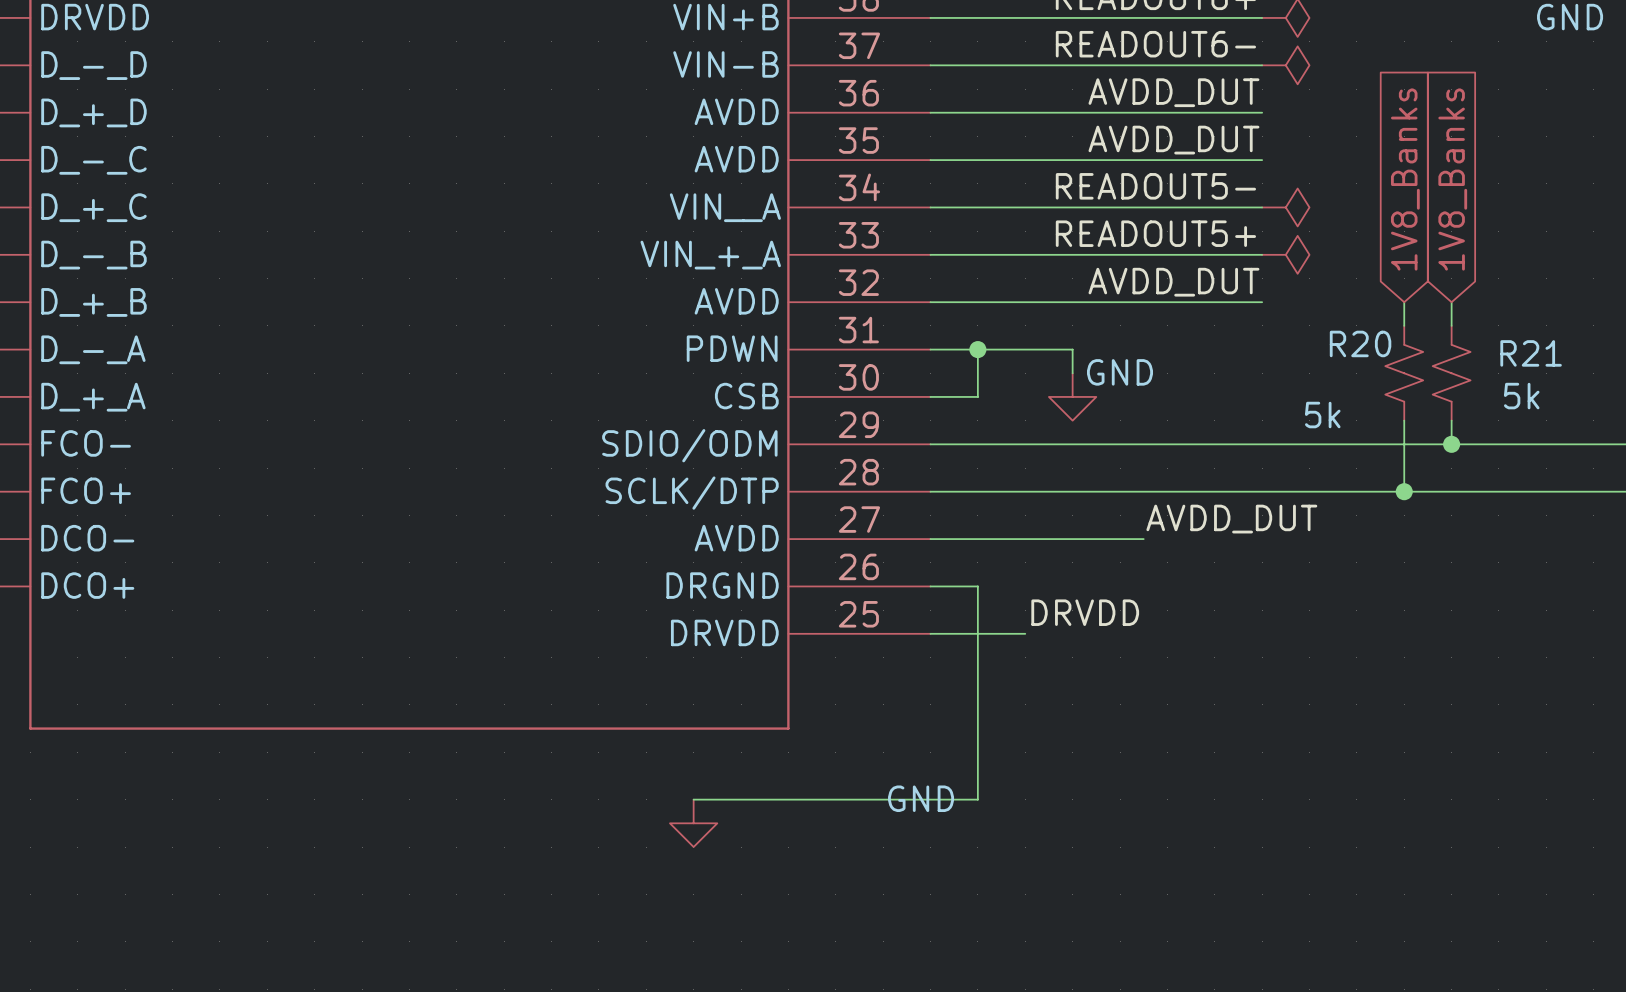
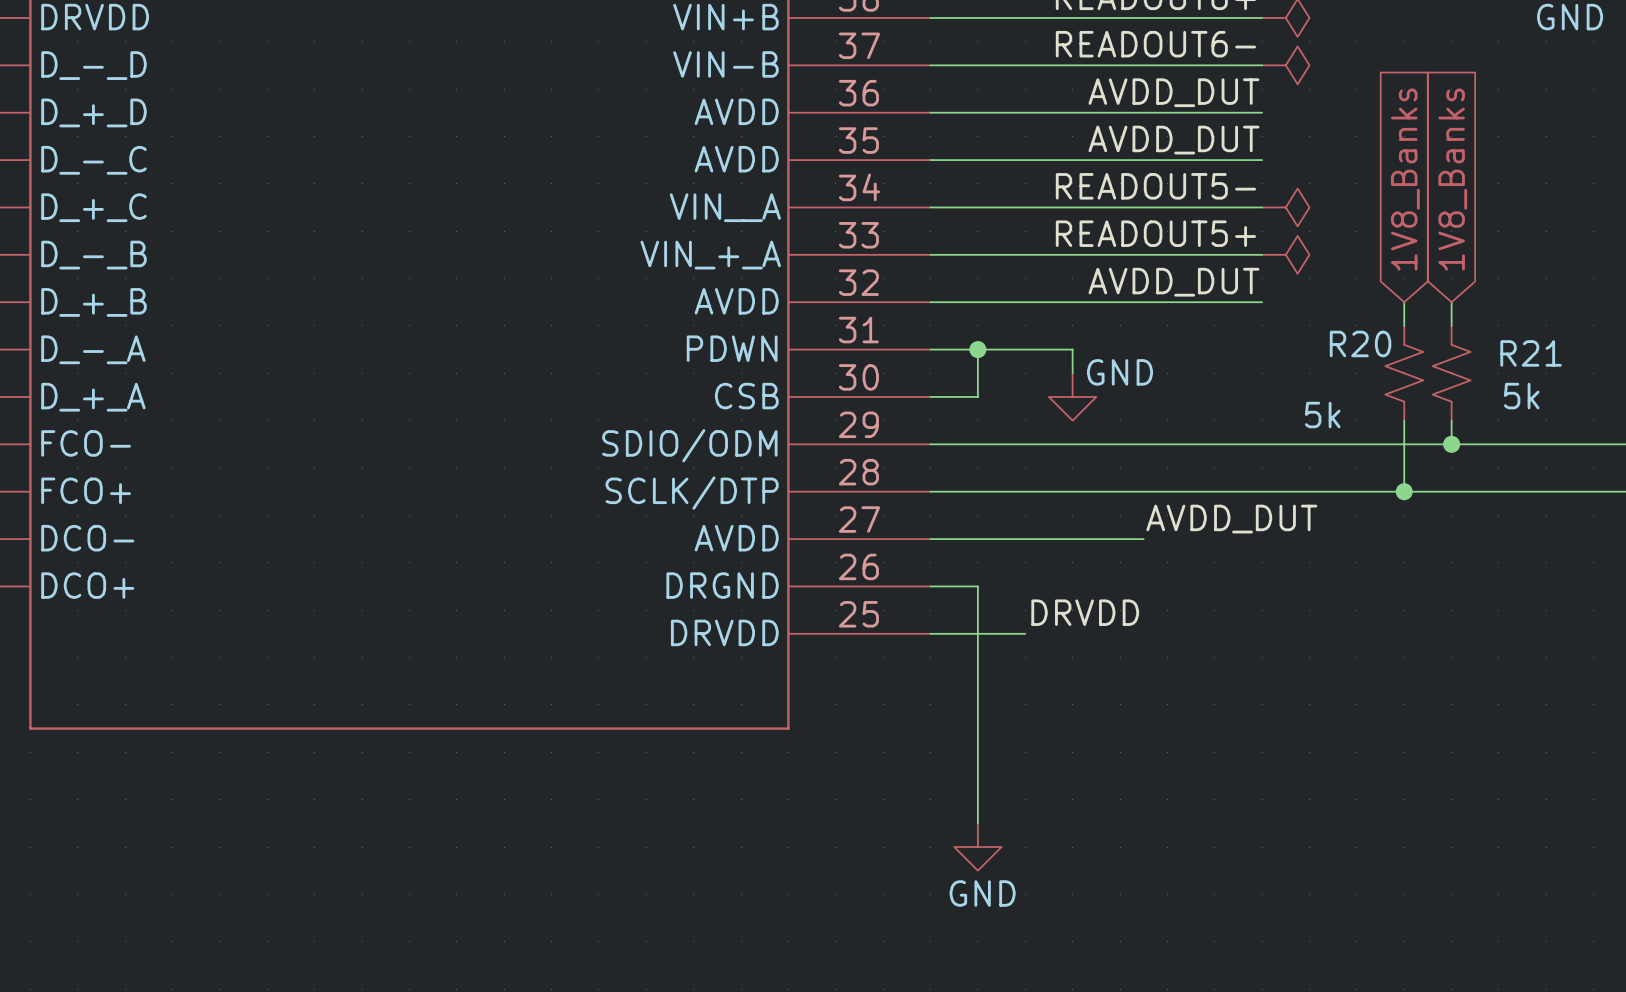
power symbol text position: GND (921, 798) -> GND (982, 893)
wire: (693, 799) (977, 799) -> (977, 823) (977, 799)
power symbol position: GND (693, 823) -> GND (977, 847)

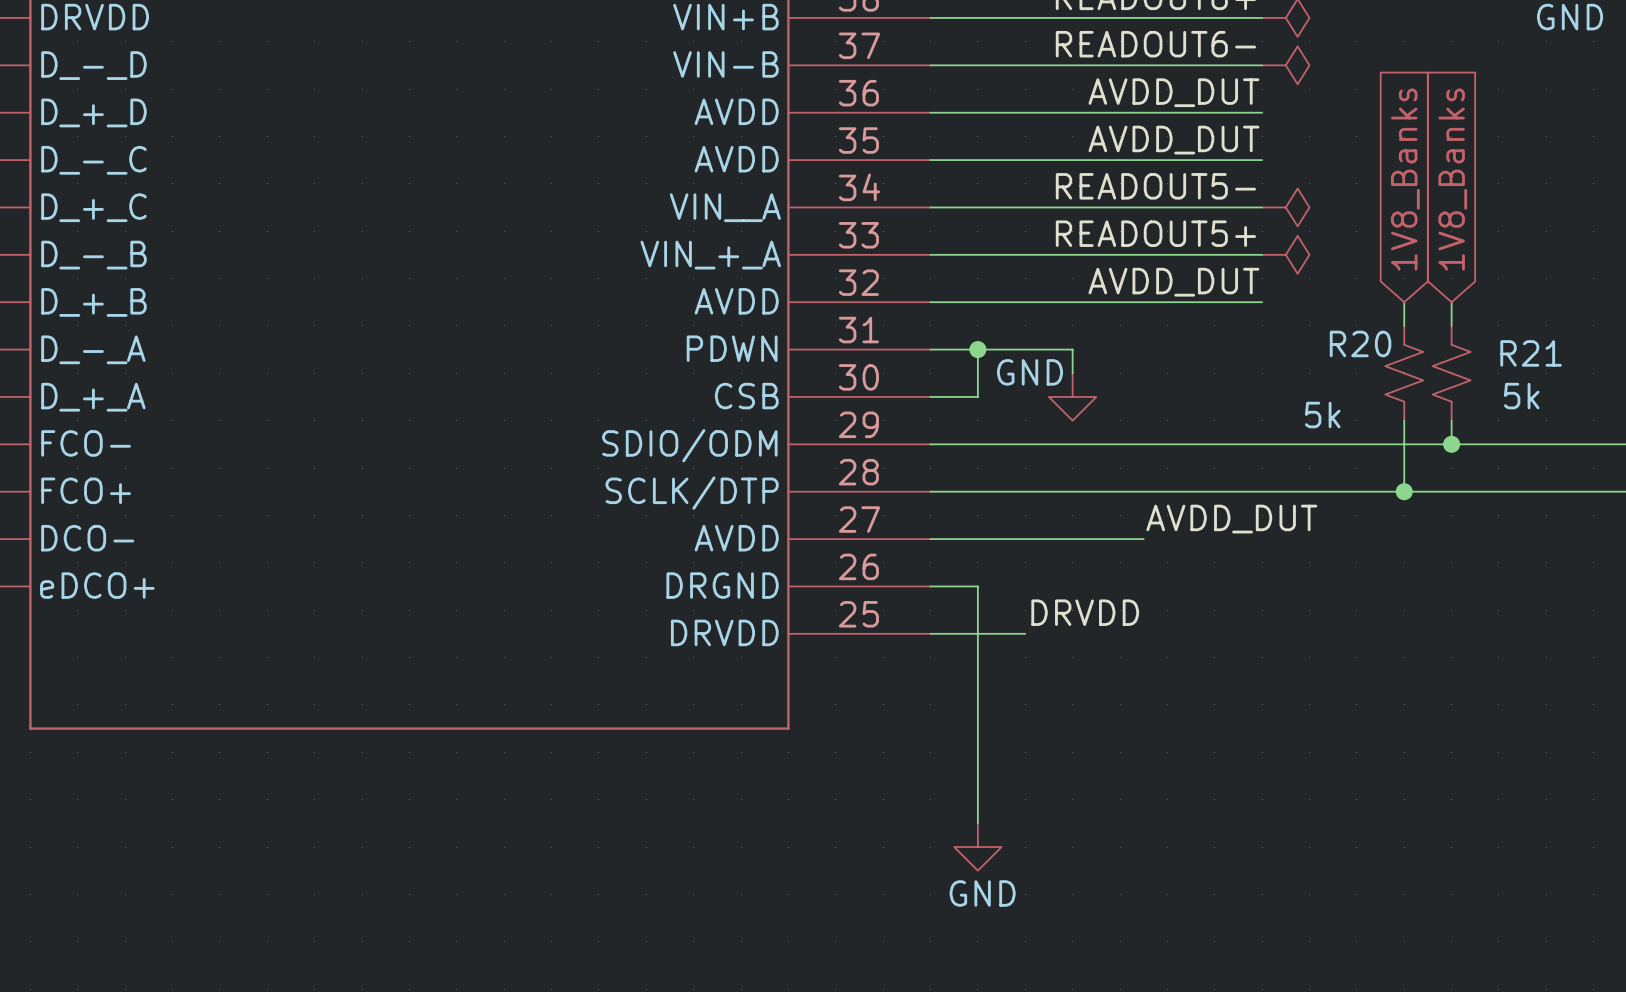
power symbol text position: GND (1120, 372) -> GND (1029, 372)
part pin name: DCO+ (87, 585) -> eDCO+ (97, 585)

